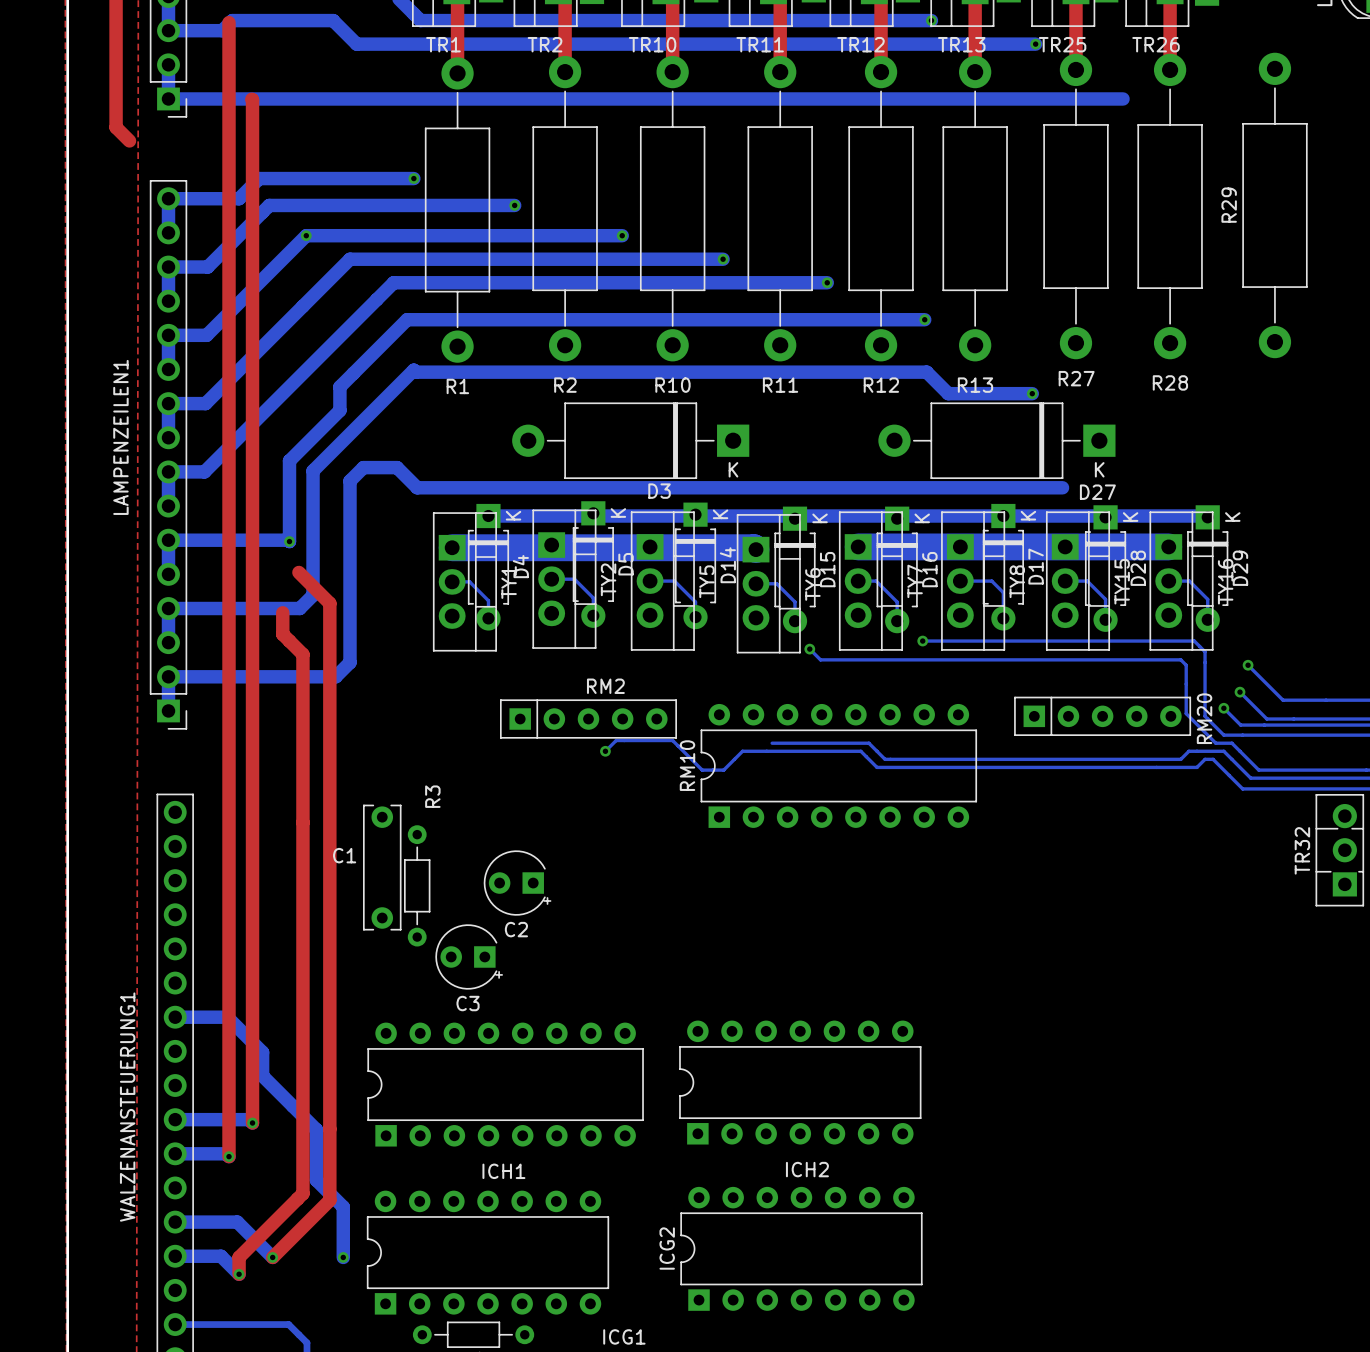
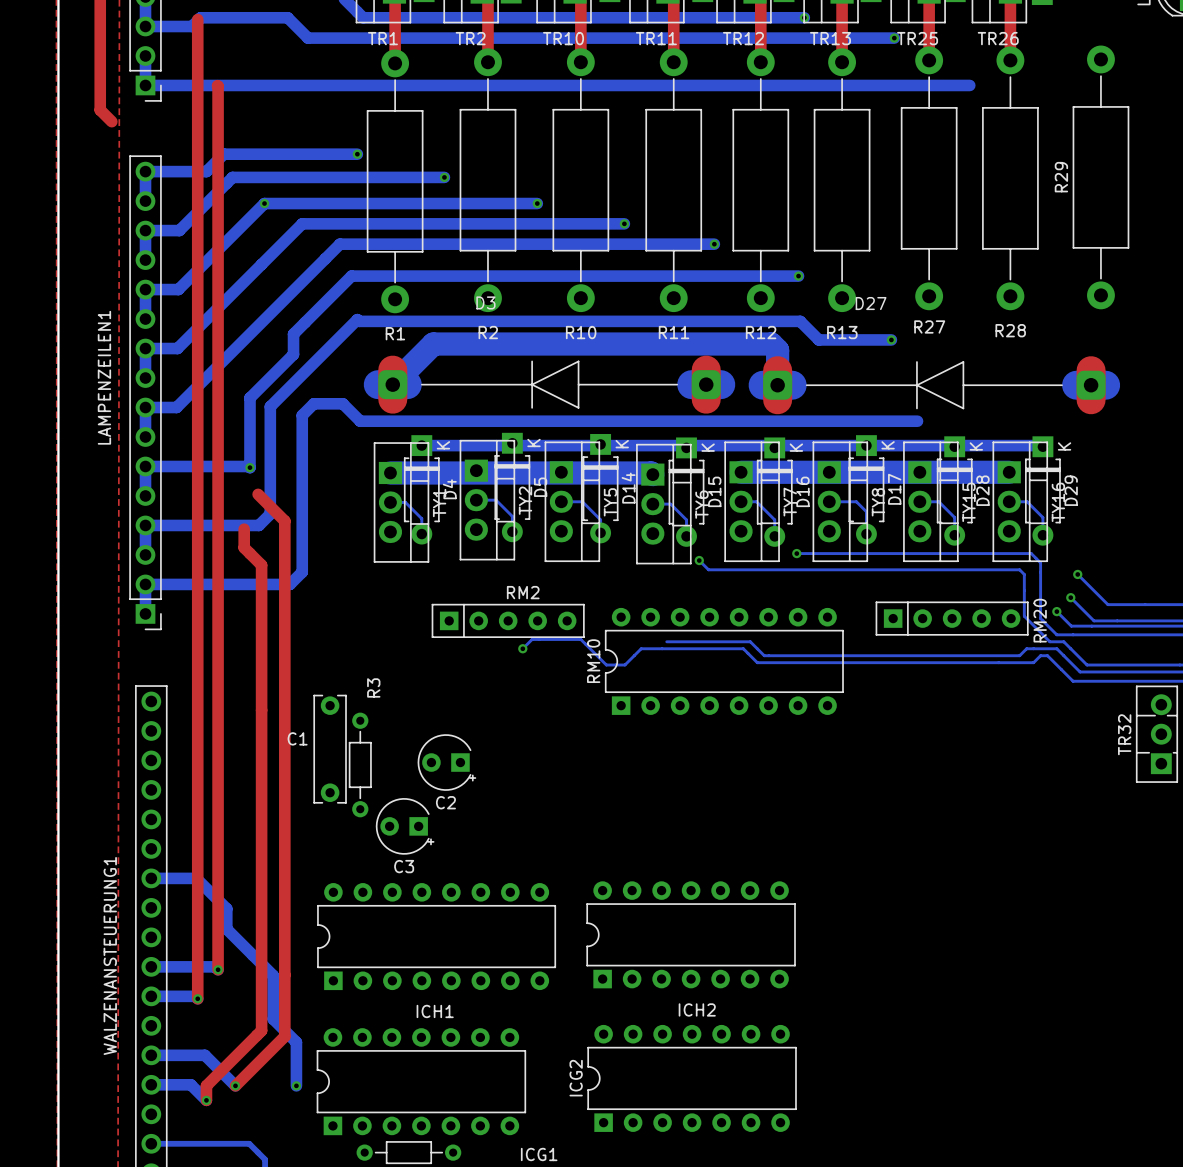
D3 footprint: [512, 402, 750, 479] -> [363, 355, 736, 414]
D27 footprint: [878, 402, 1116, 479] -> [748, 356, 1121, 415]
bottom track: none -> (392, 384) (433, 344) (771, 344) (777, 350) (777, 385)
D3 name position: D3 (659, 491) -> D3 (485, 302)
D27 name position: D27 (1097, 492) -> D27 (871, 303)

